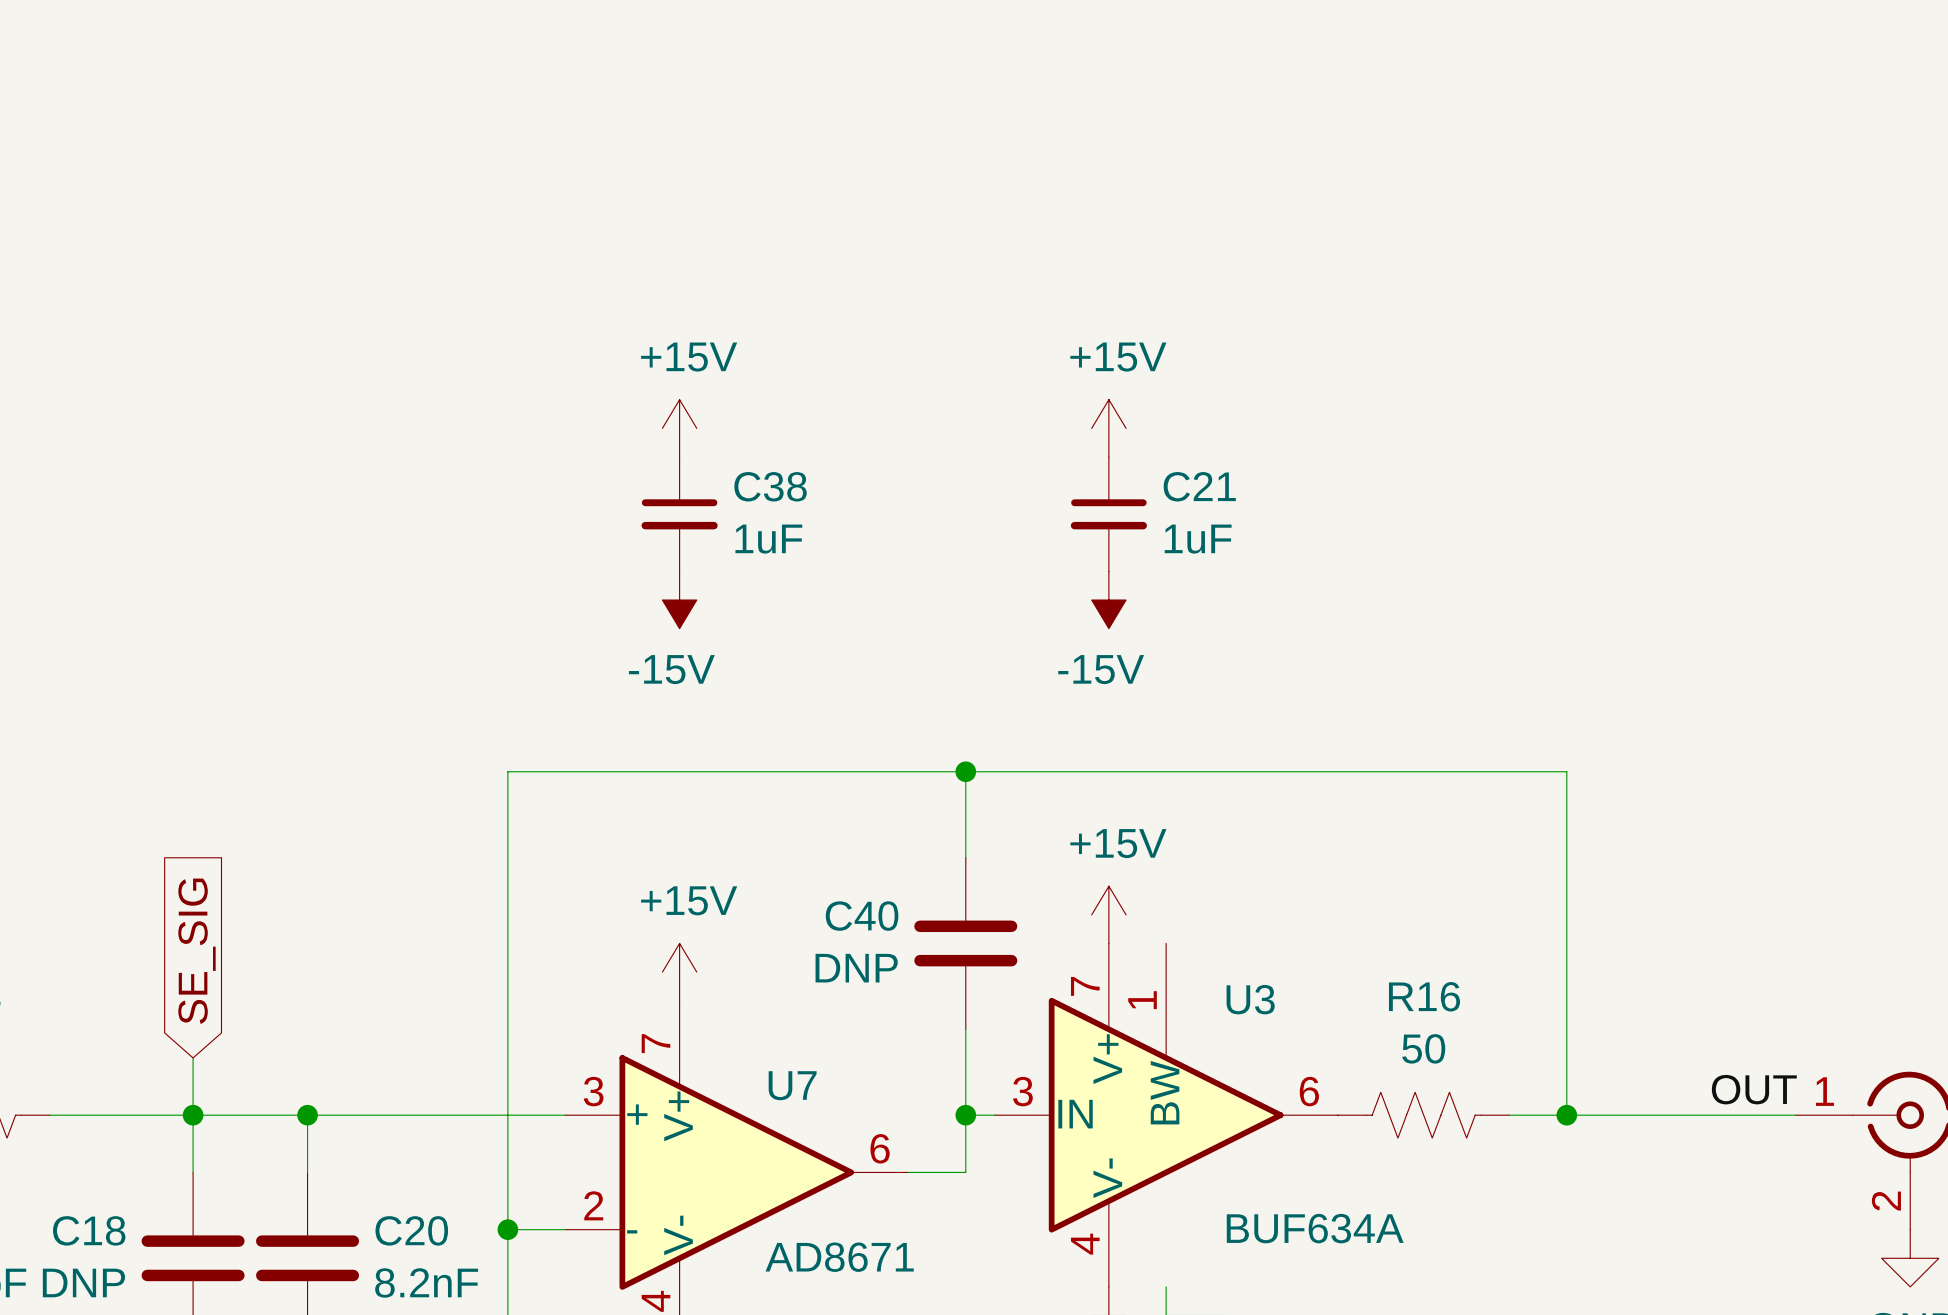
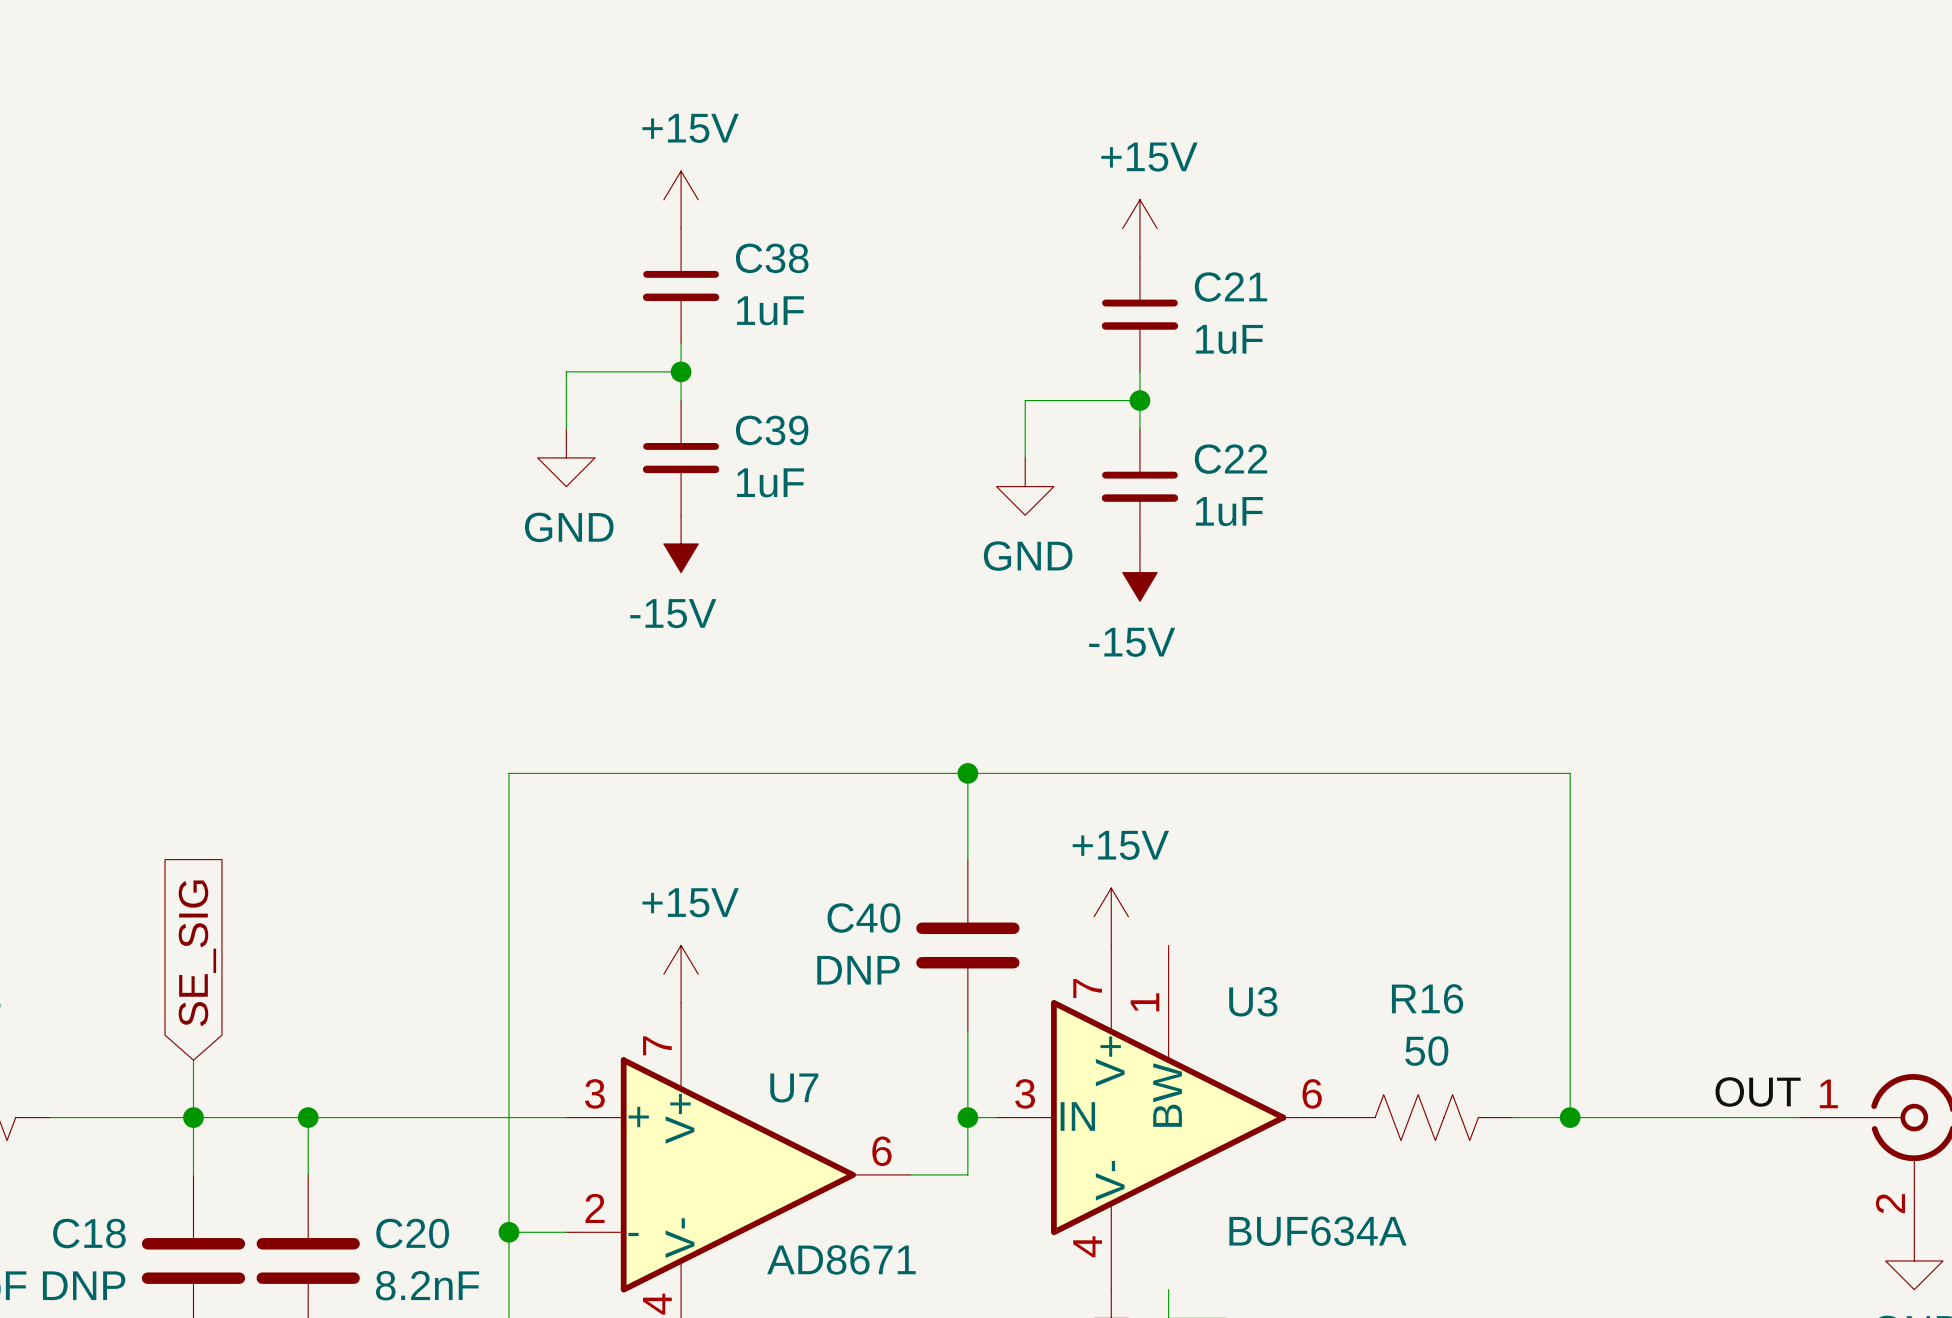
wire: none -> (681, 343) (681, 400)
wire: none -> (681, 371) (566, 371) (566, 429)
junction: none -> (681, 371)
wire: none -> (1139, 371) (1139, 429)
wire: none -> (1139, 400) (1025, 400) (1025, 457)
junction: none -> (1139, 400)
power symbol position: +15V (679, 428) -> +15V (681, 199)
power symbol position: +15V (1108, 428) -> +15V (1139, 228)
power symbol: none -> GND (566, 457)
C39: none -> 1uF (681, 457)
power symbol: none -> GND (1025, 486)
C22: none -> 1uF (1139, 486)
C38 position: (679, 514) -> (681, 285)
C21 position: (1108, 514) -> (1139, 314)
power symbol position: -15V (679, 600) -> -15V (681, 543)
power symbol position: -15V (1108, 600) -> -15V (1139, 572)

